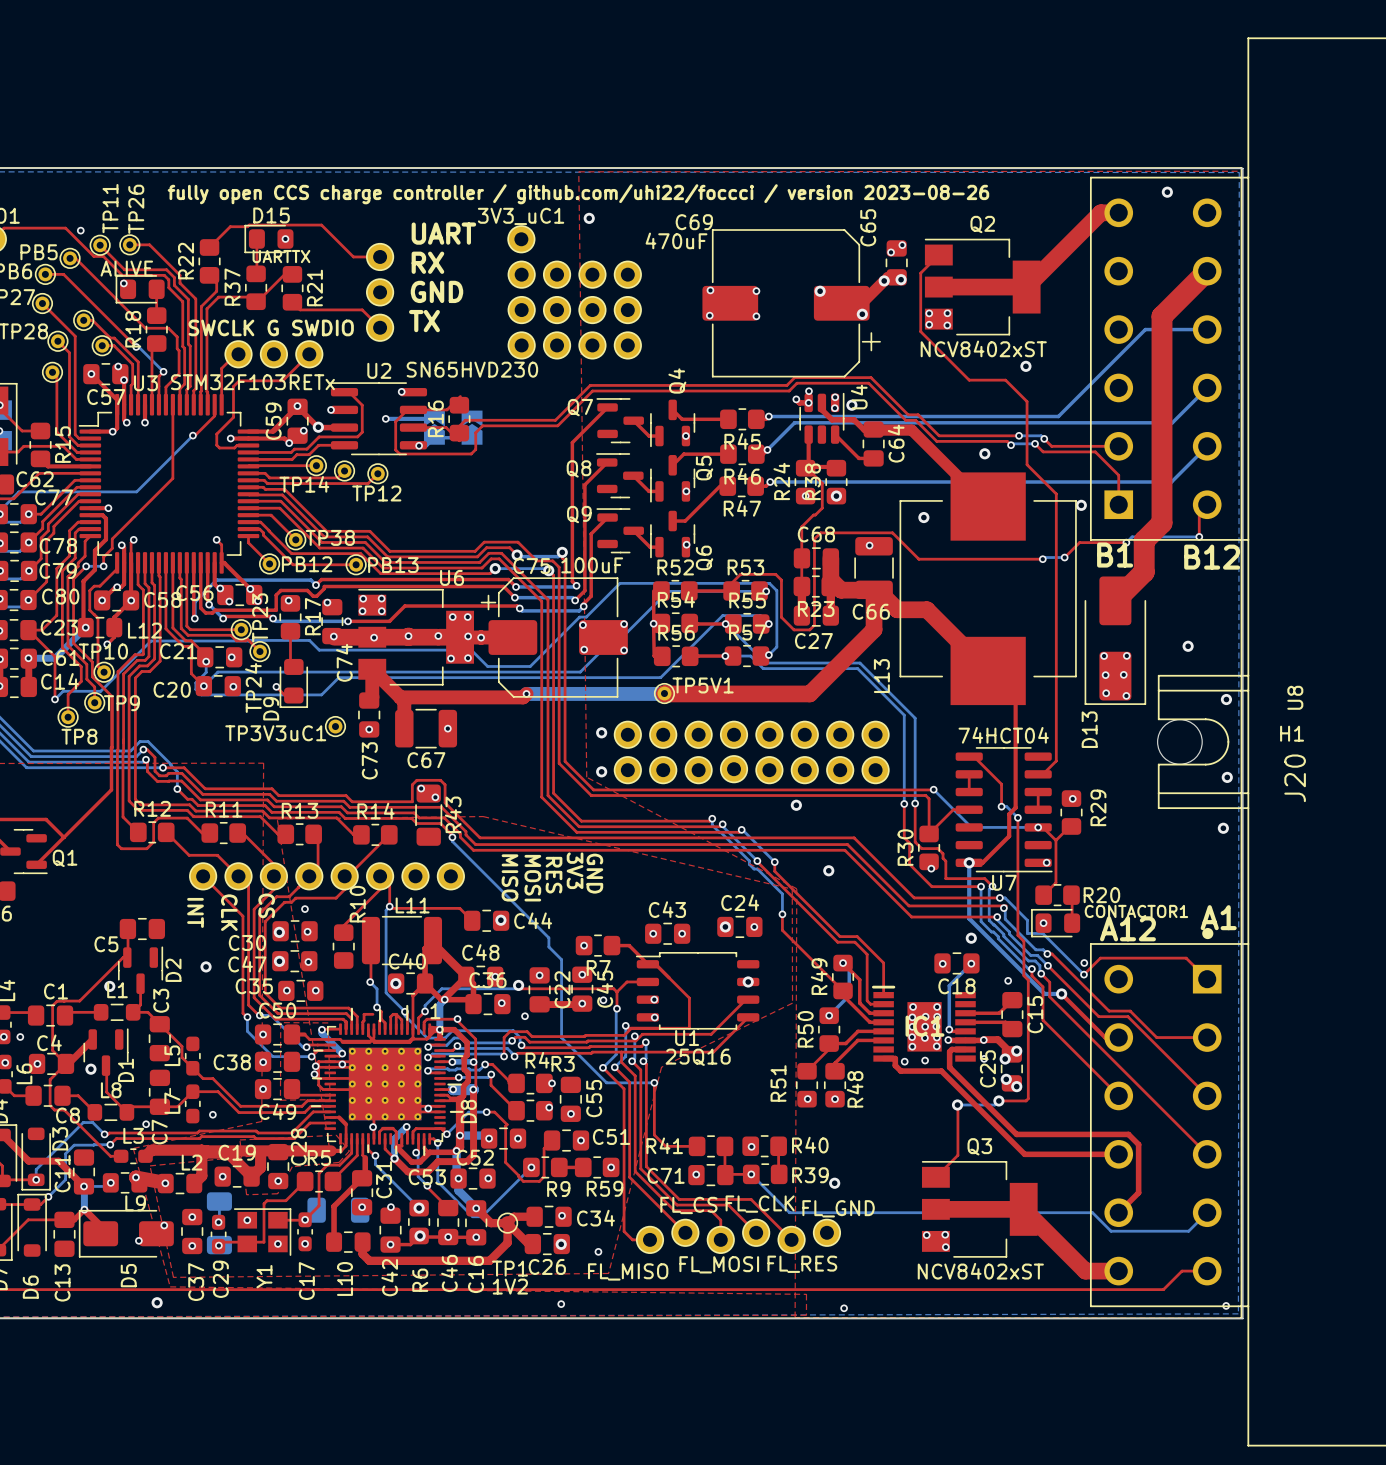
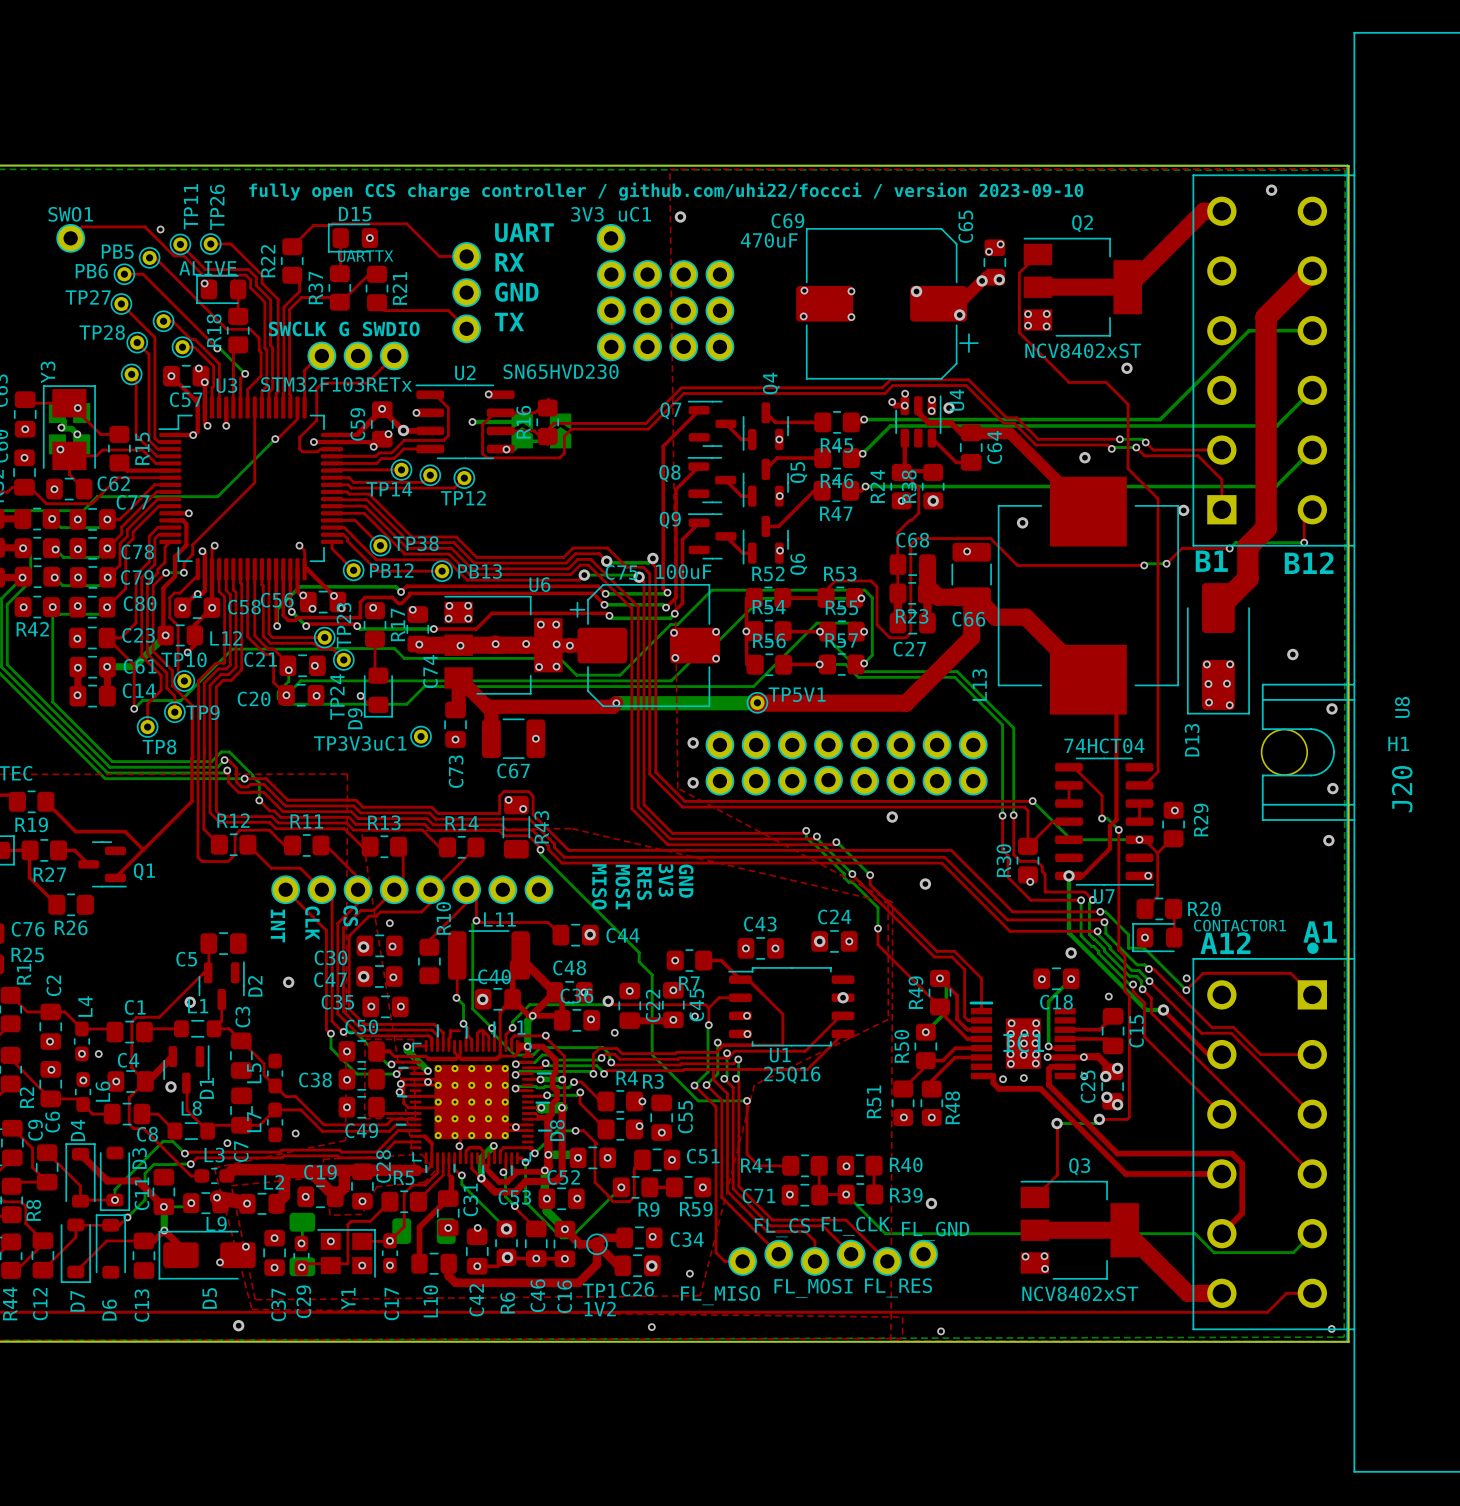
text: fully open CCS charge controller / github.com/uhi22/foccci / version 2023-08-26 (578, 194) -> fully open CCS charge controller / github.com/uhi22/foccci / version 2023-09-10 (666, 191)

